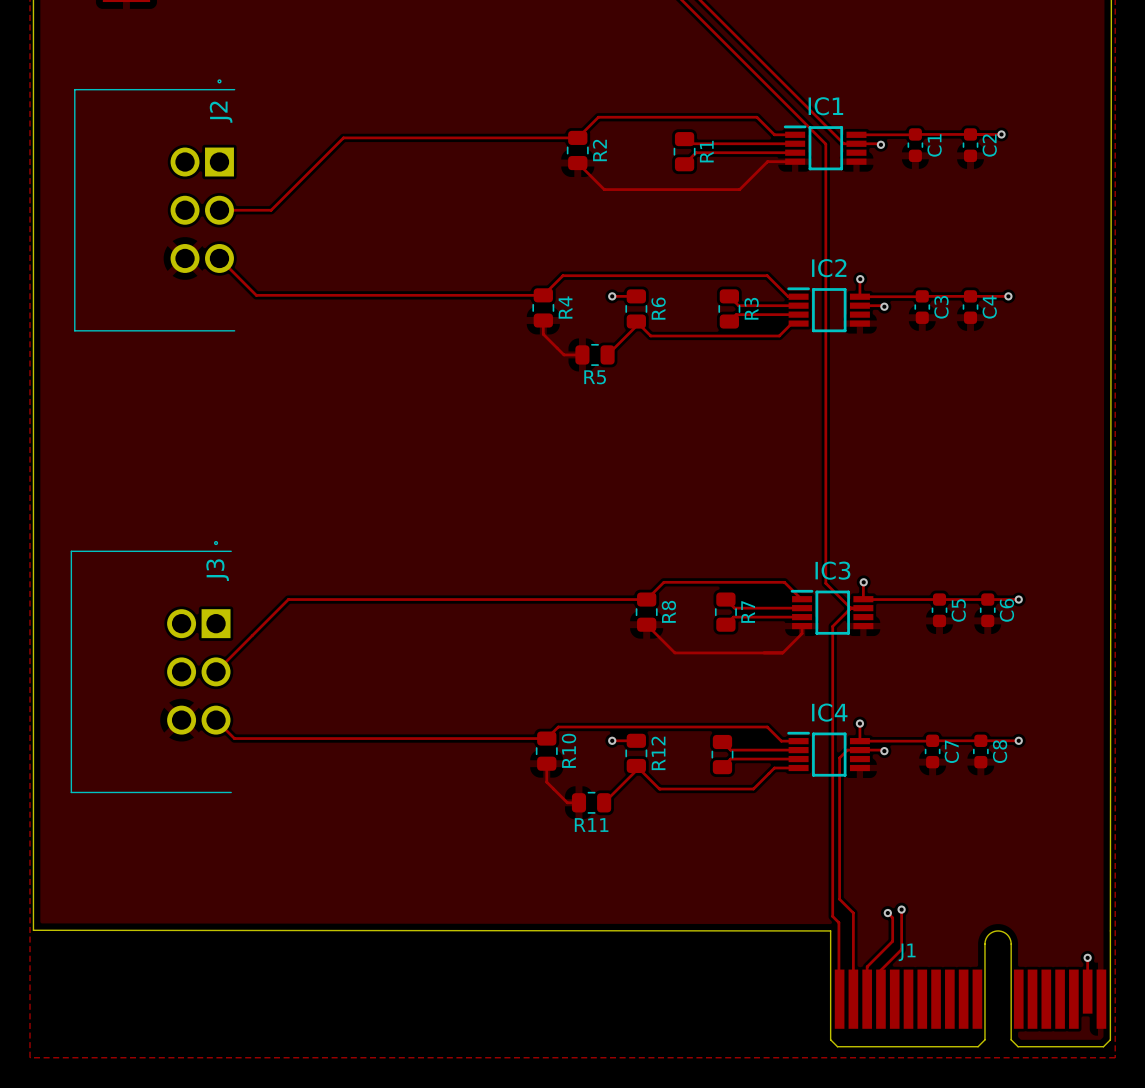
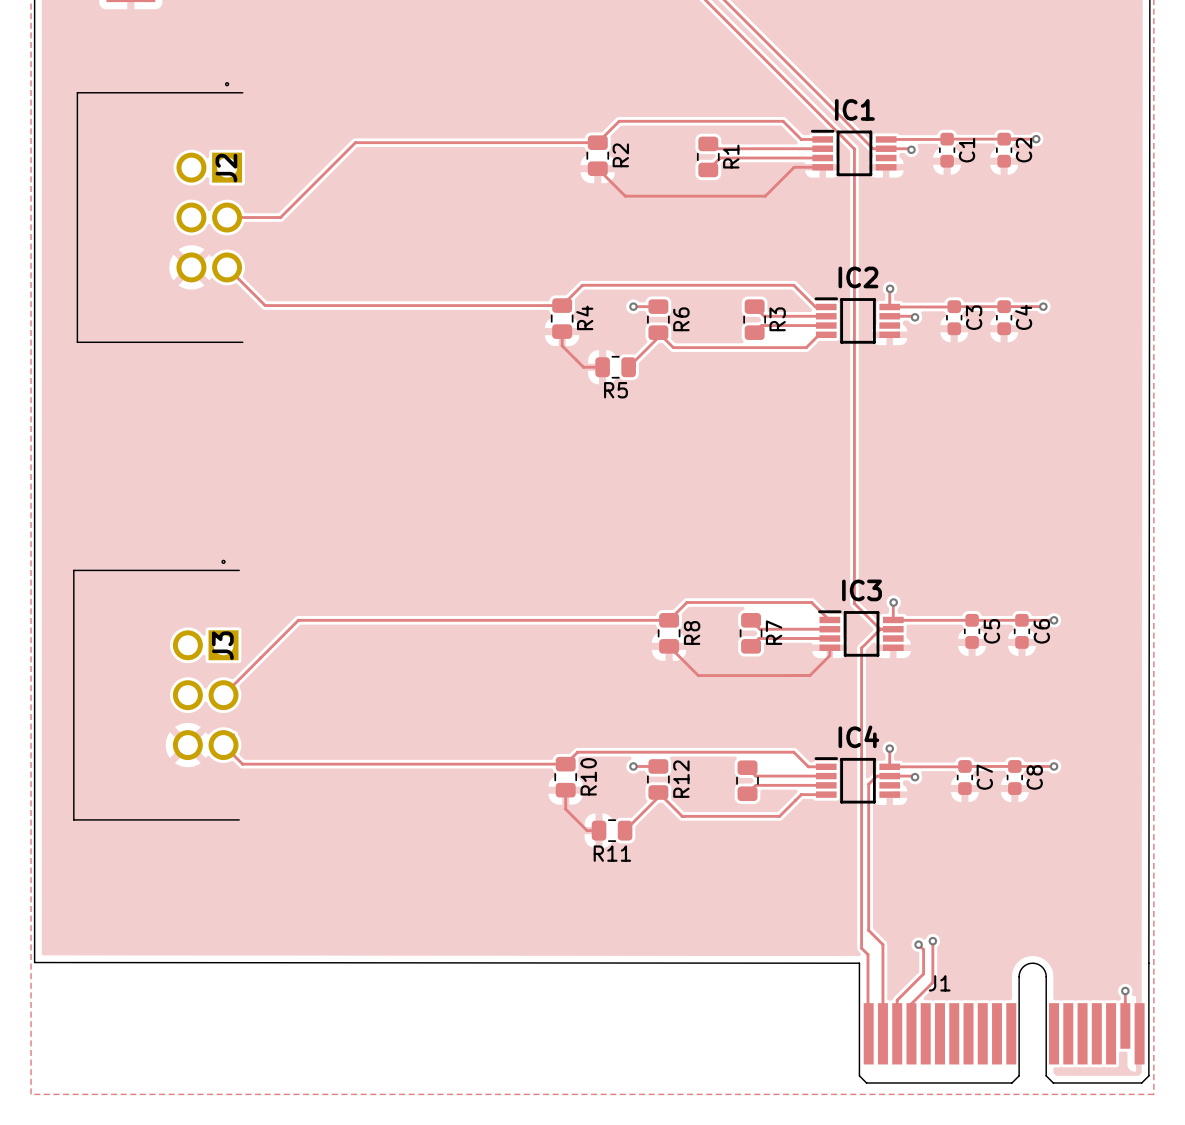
J2 name position: J2 (221, 112) -> J2 (226, 168)
J3 name position: J3 (217, 570) -> J3 (222, 645)

